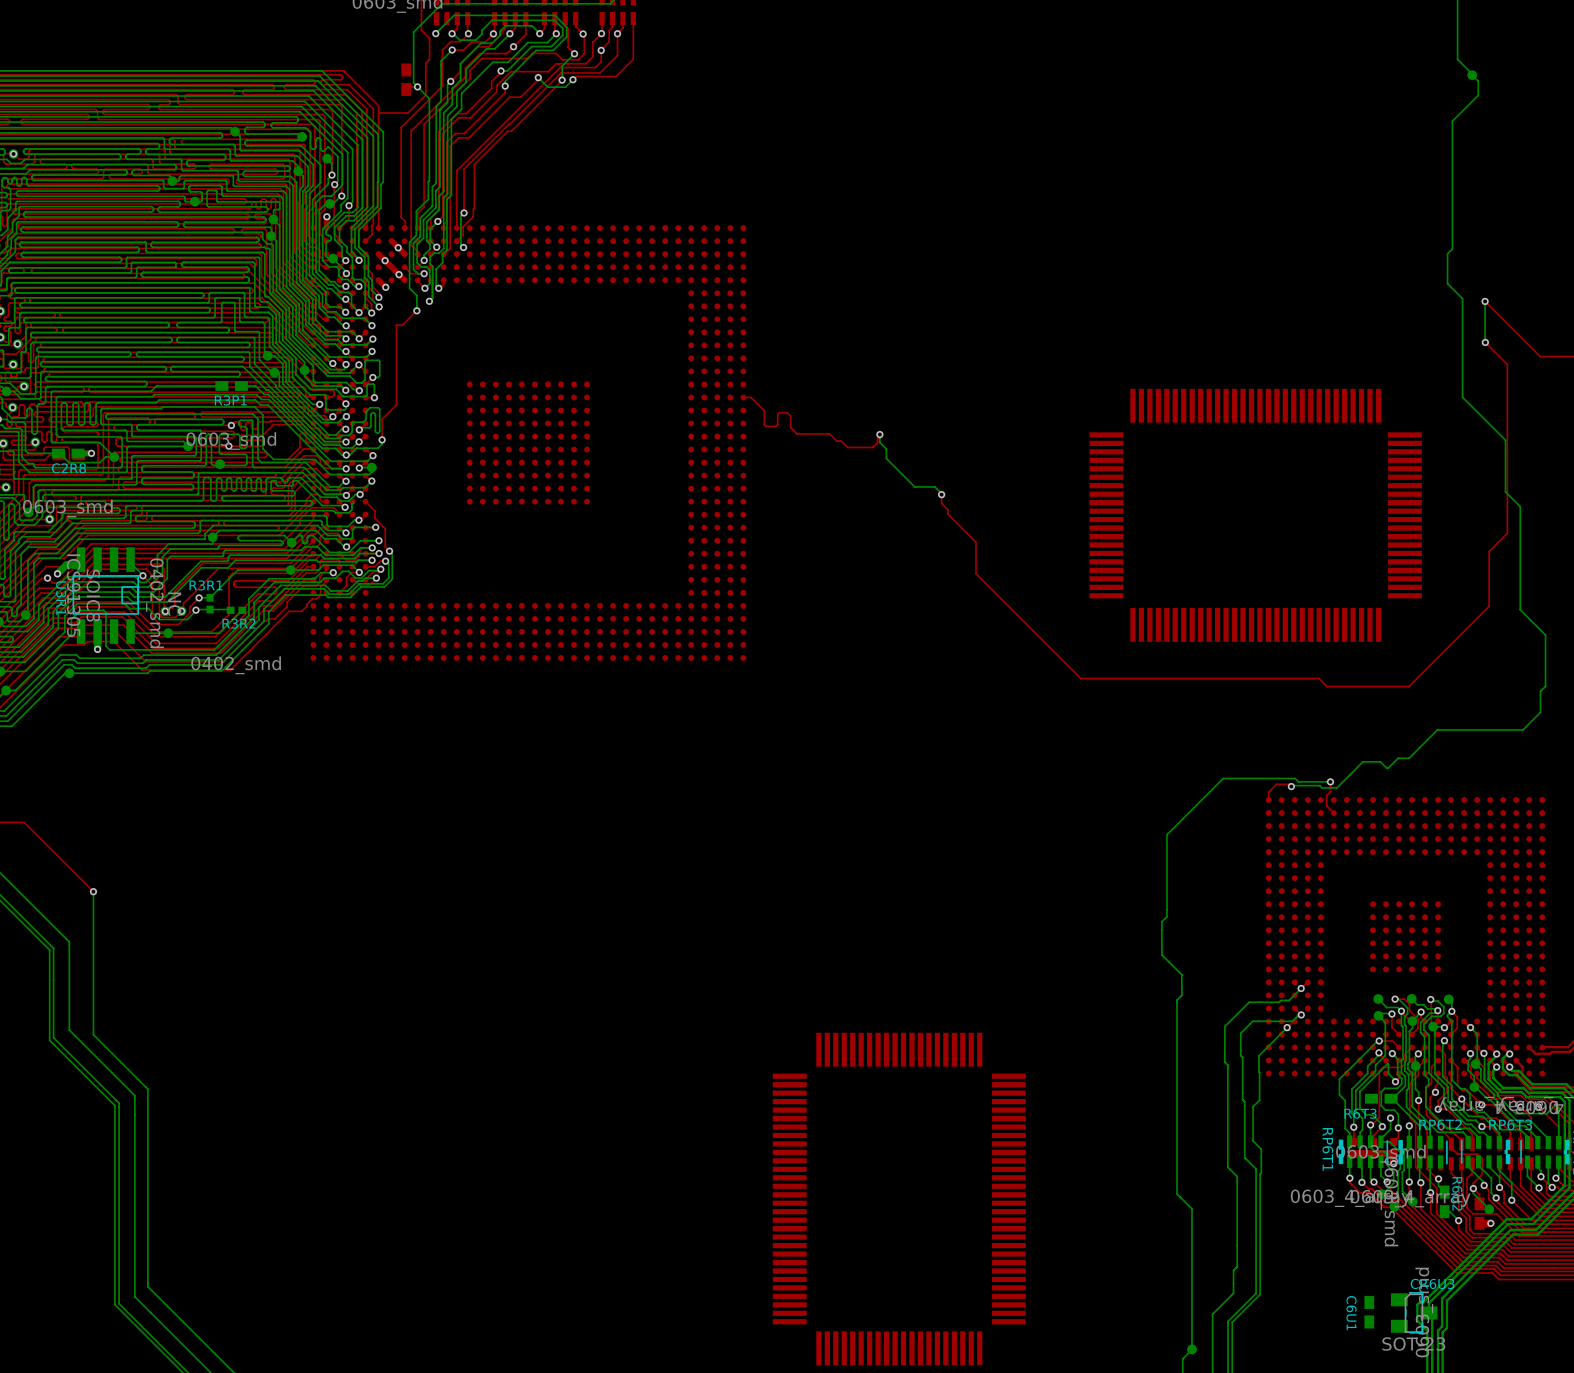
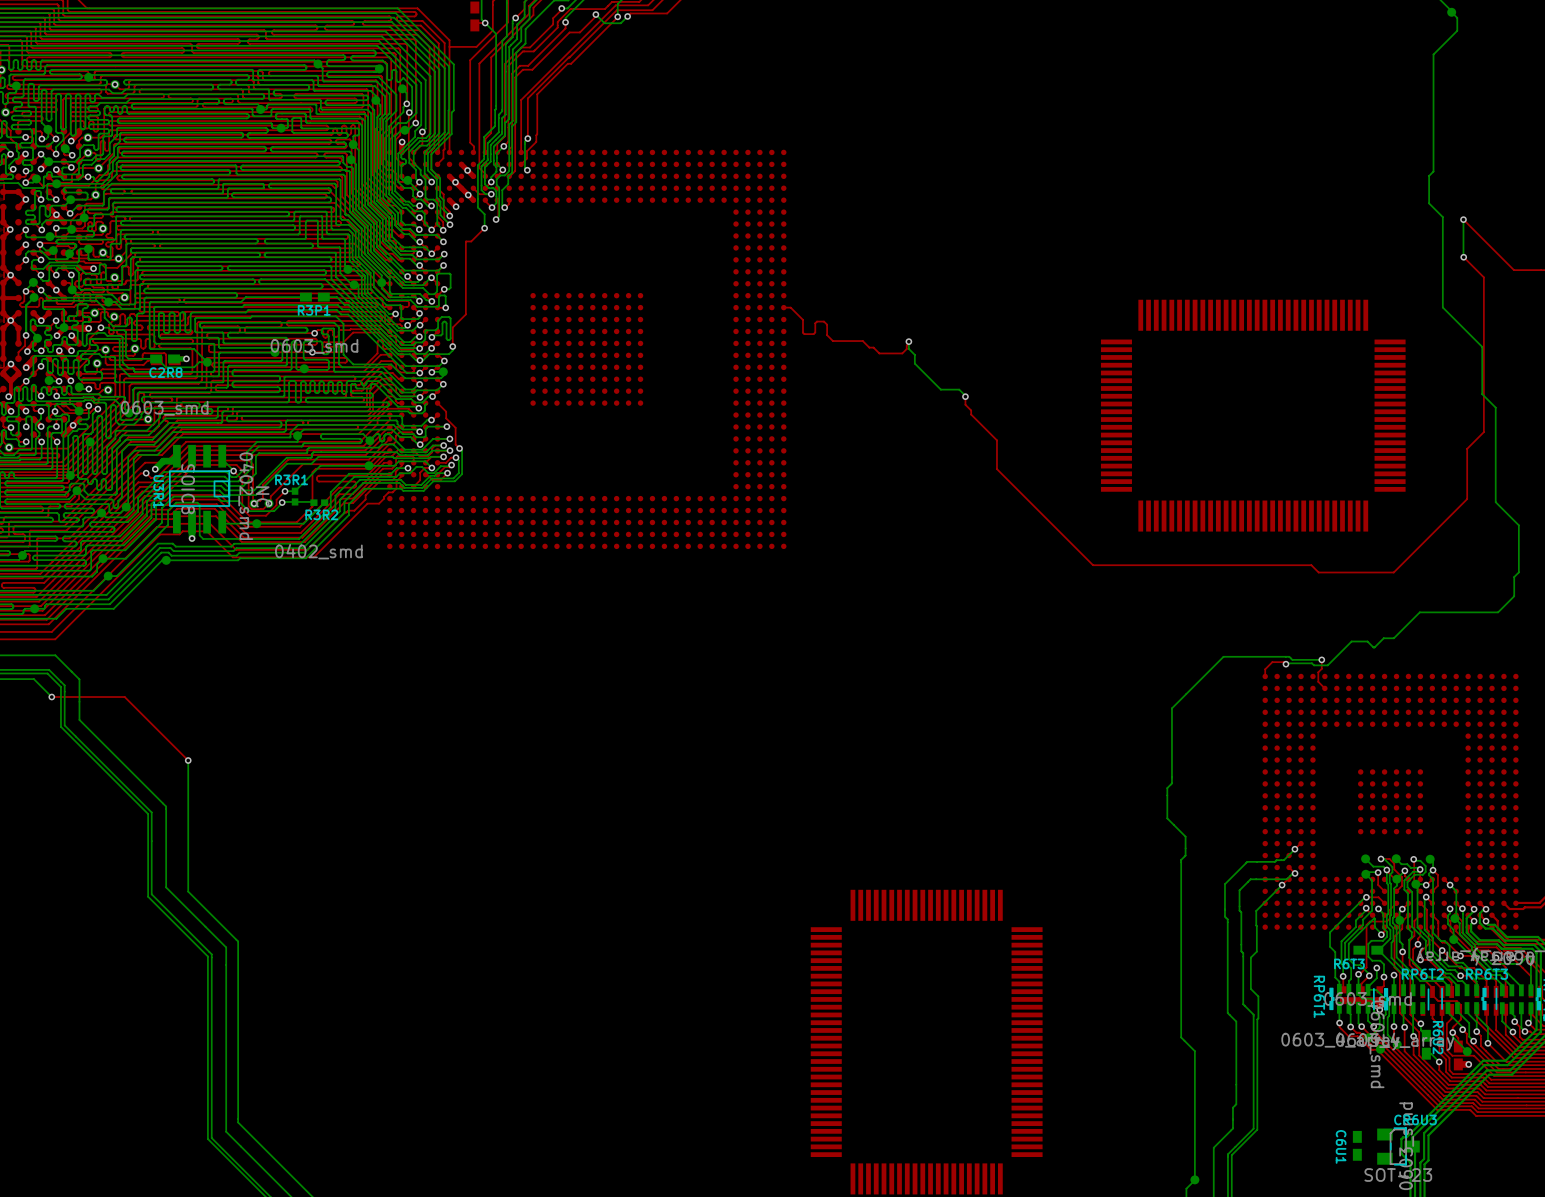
U3R1 text: ICS91305 (73, 595) -> none

